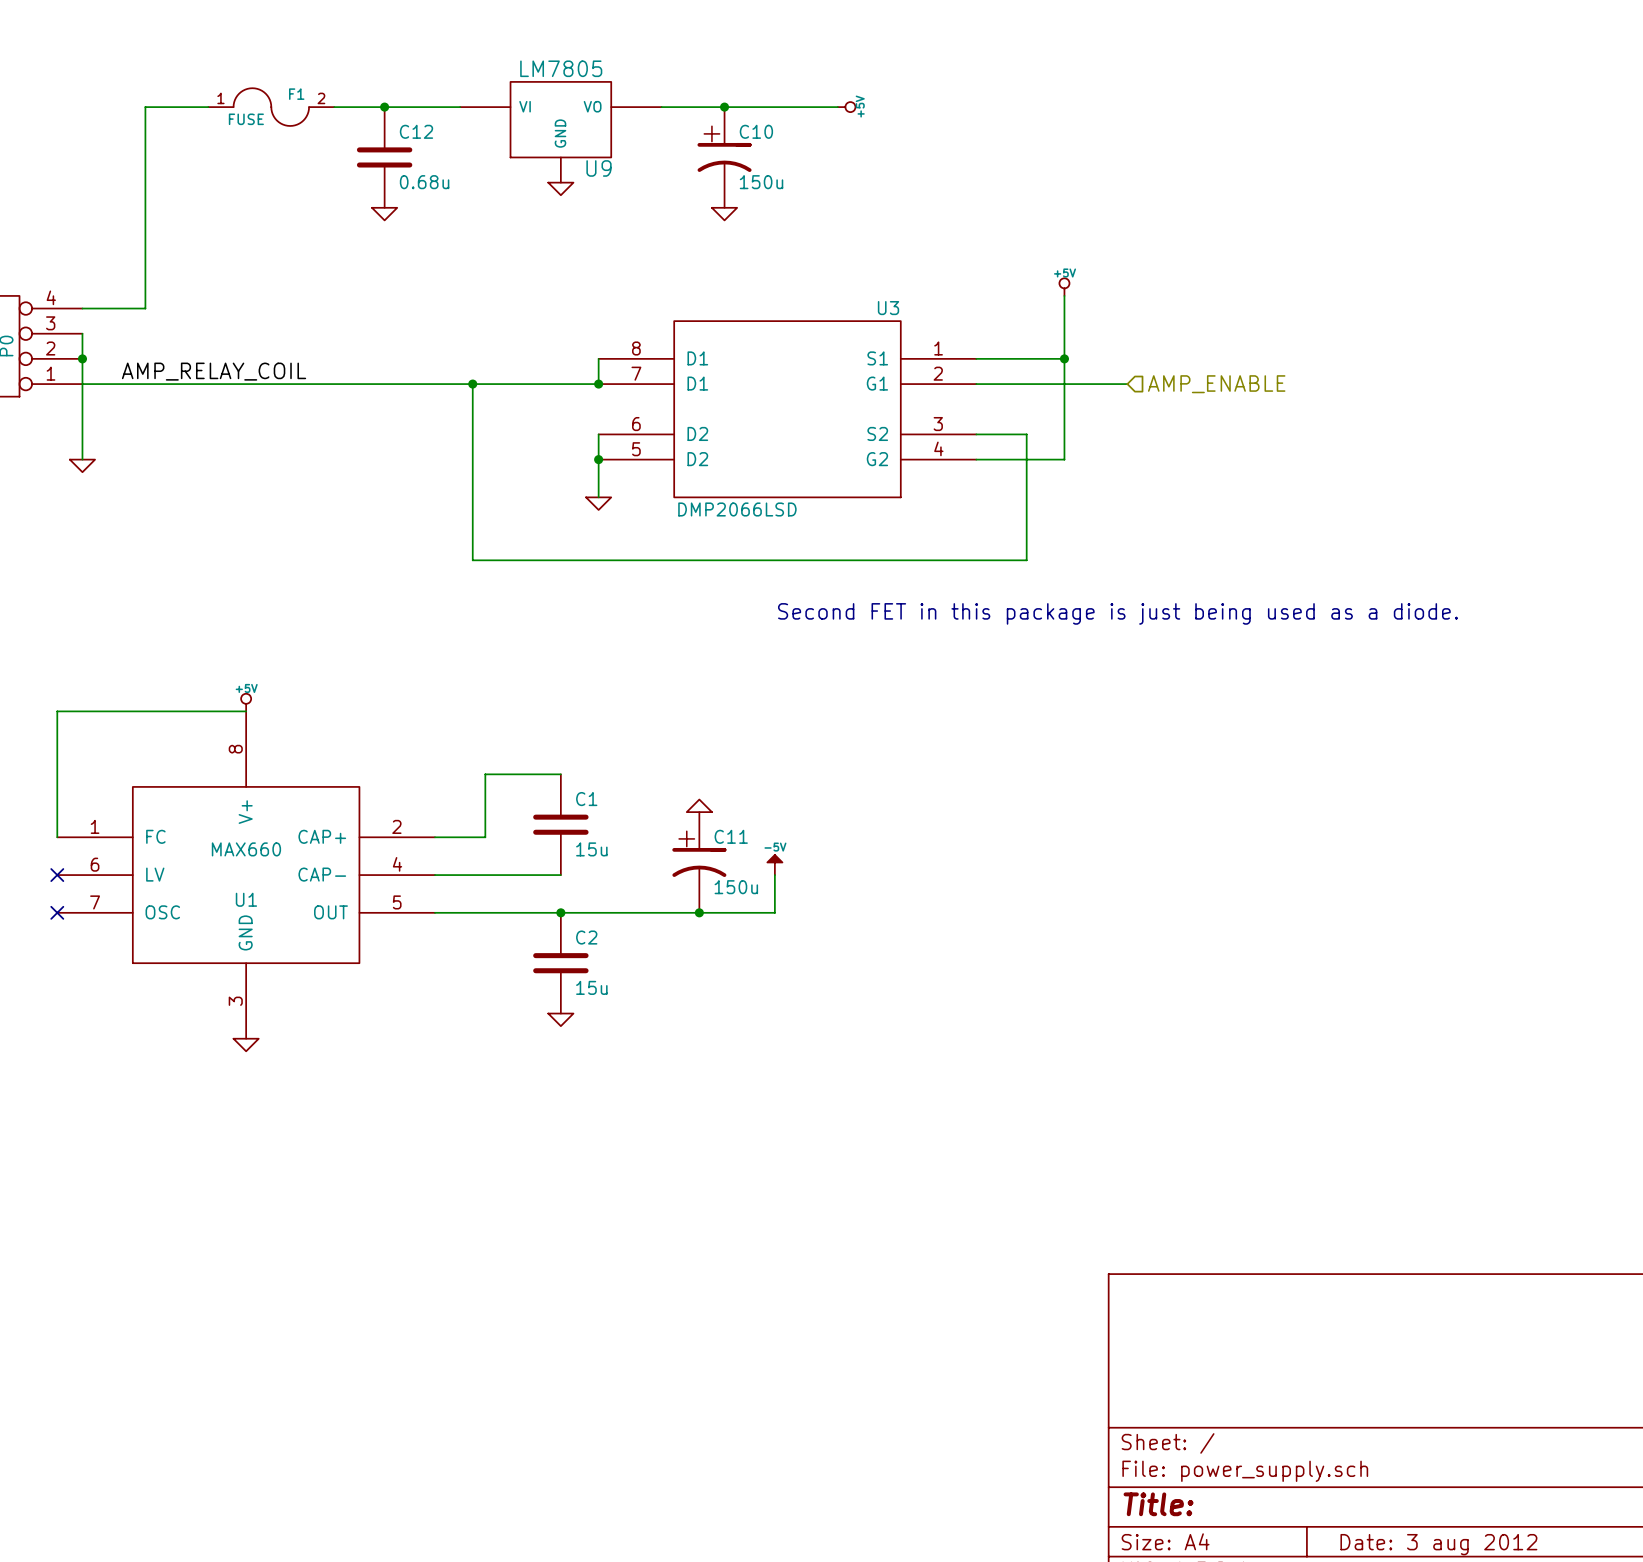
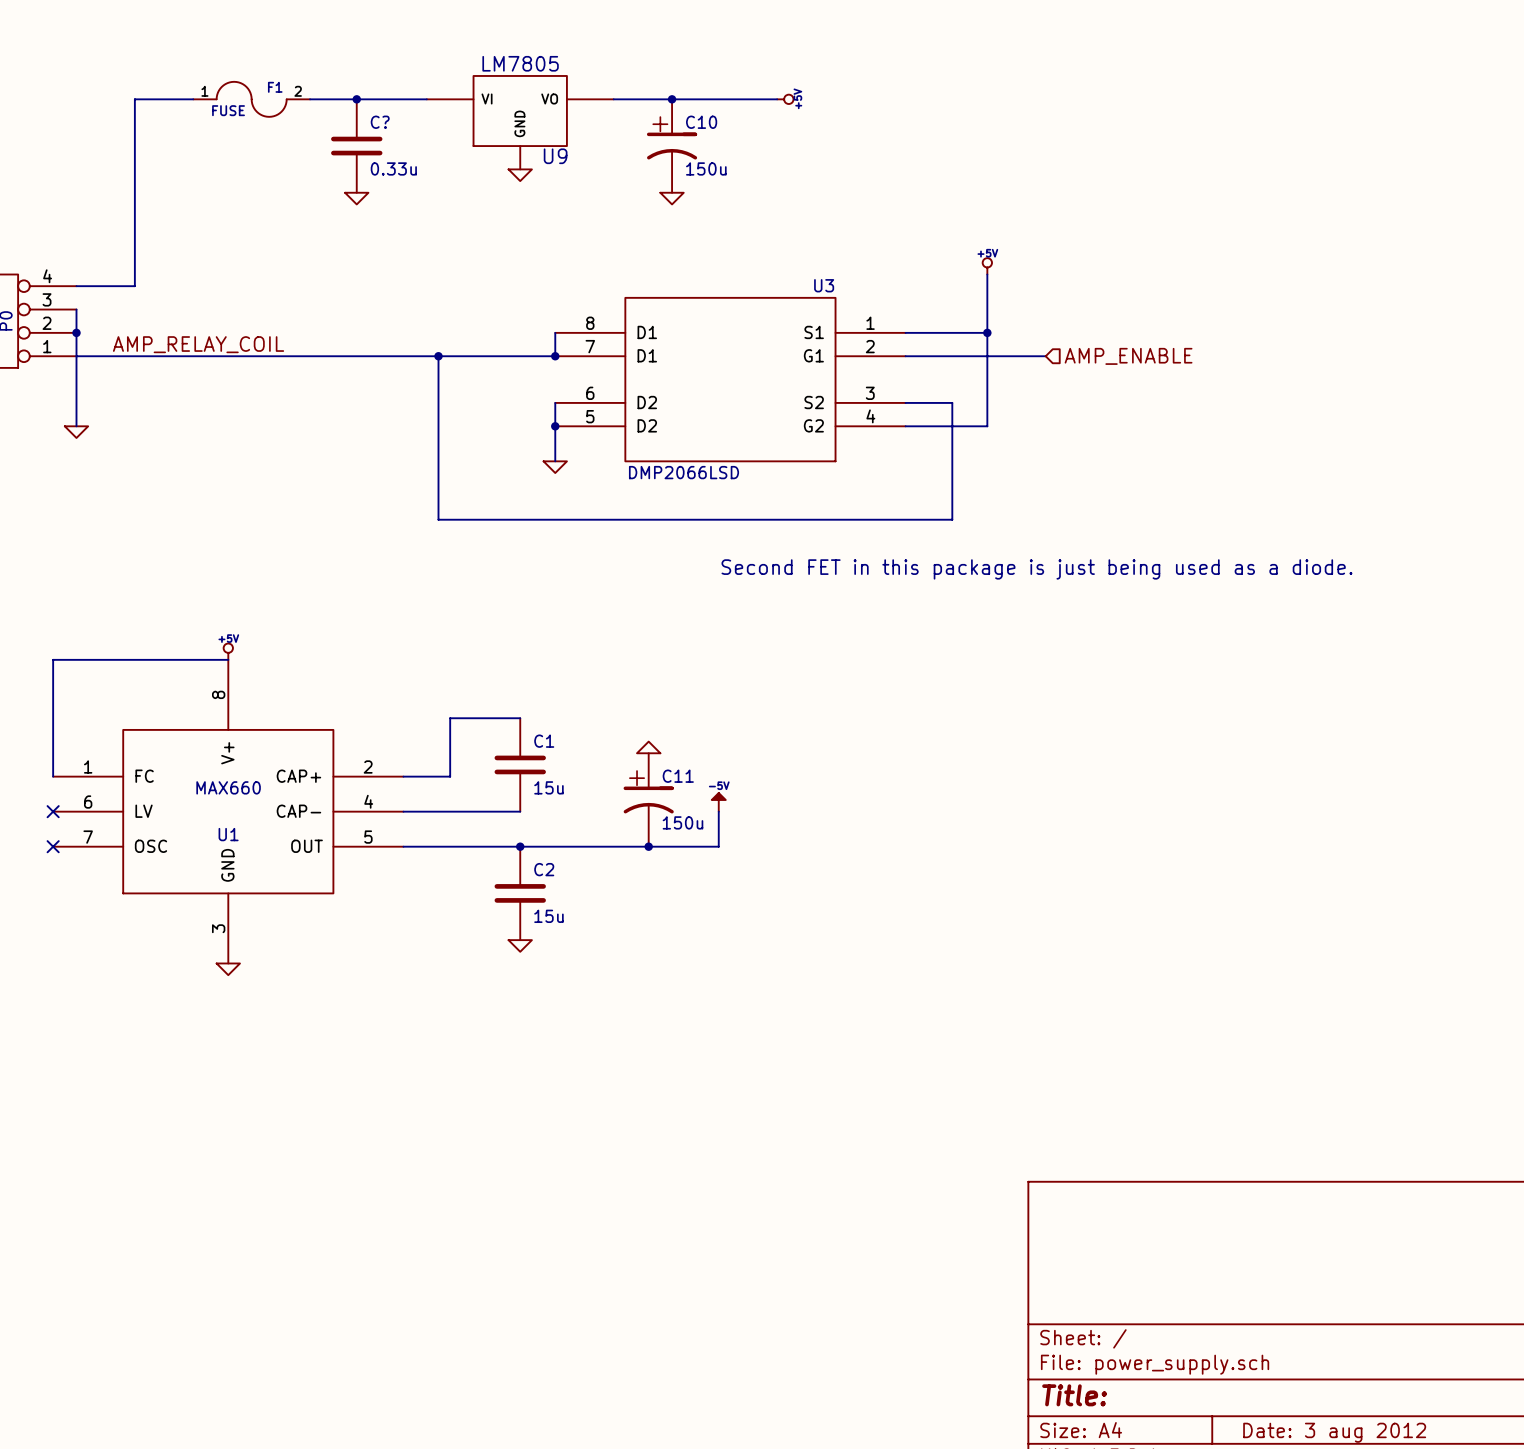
C12 name: C12 (416, 131) -> C? (380, 122)
C12 value: 0.68u (424, 182) -> 0.33u (393, 168)

